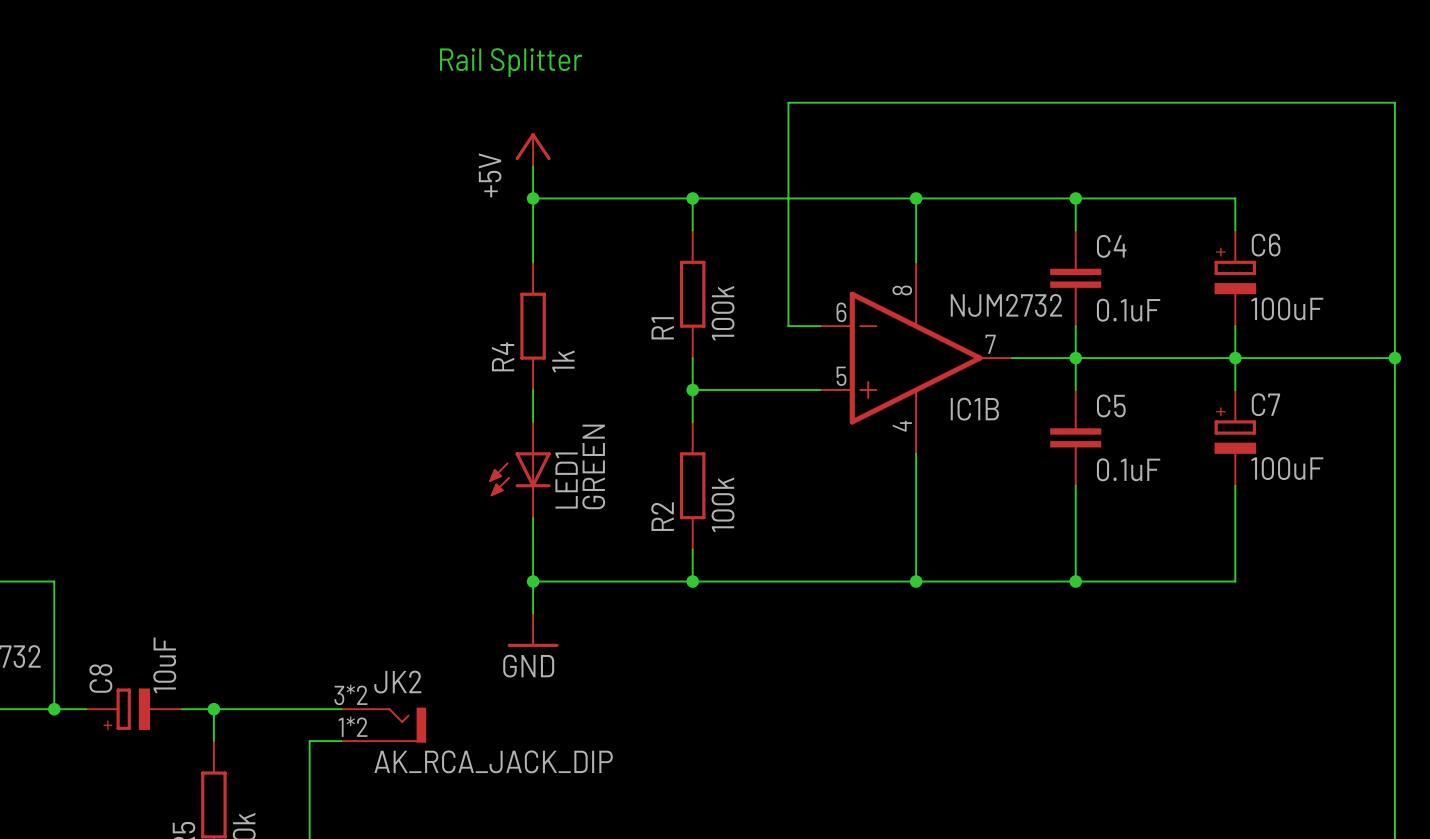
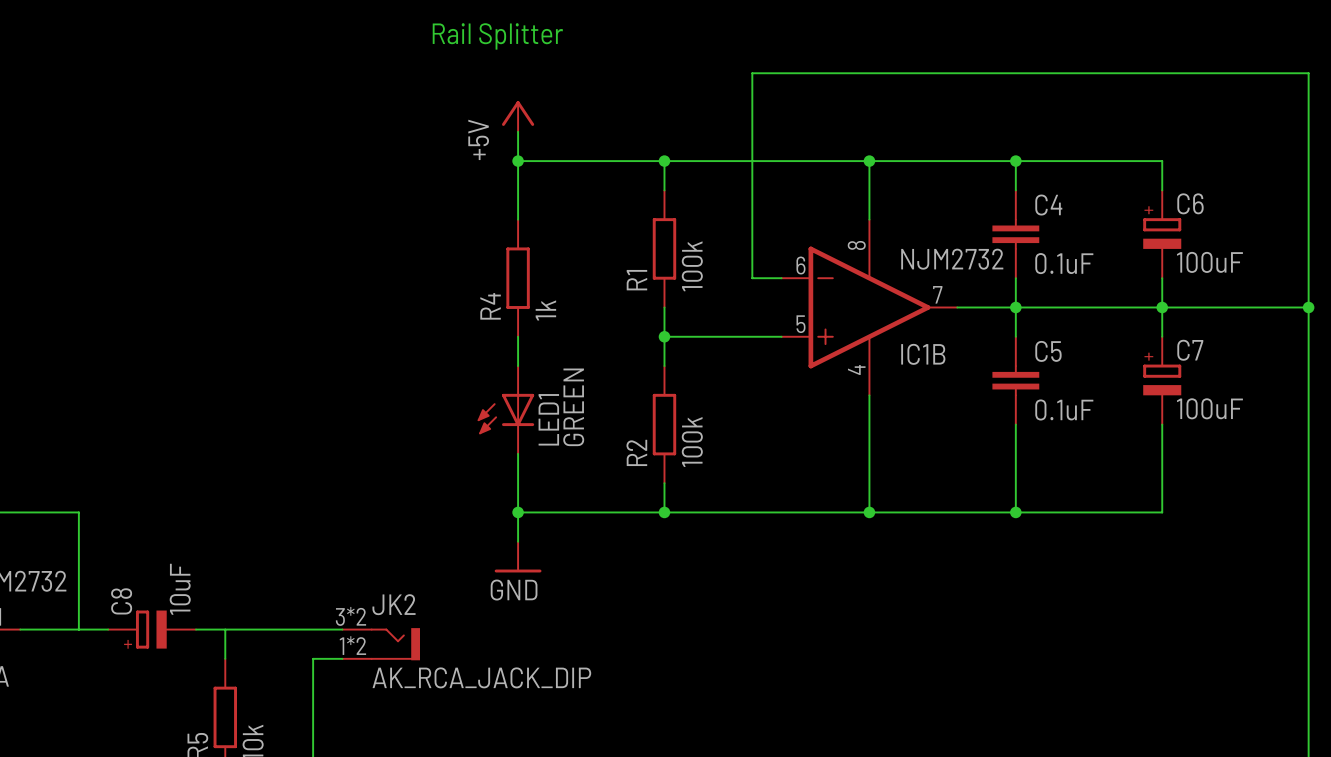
junction: (54, 709) -> none
junction: (213, 709) -> none

